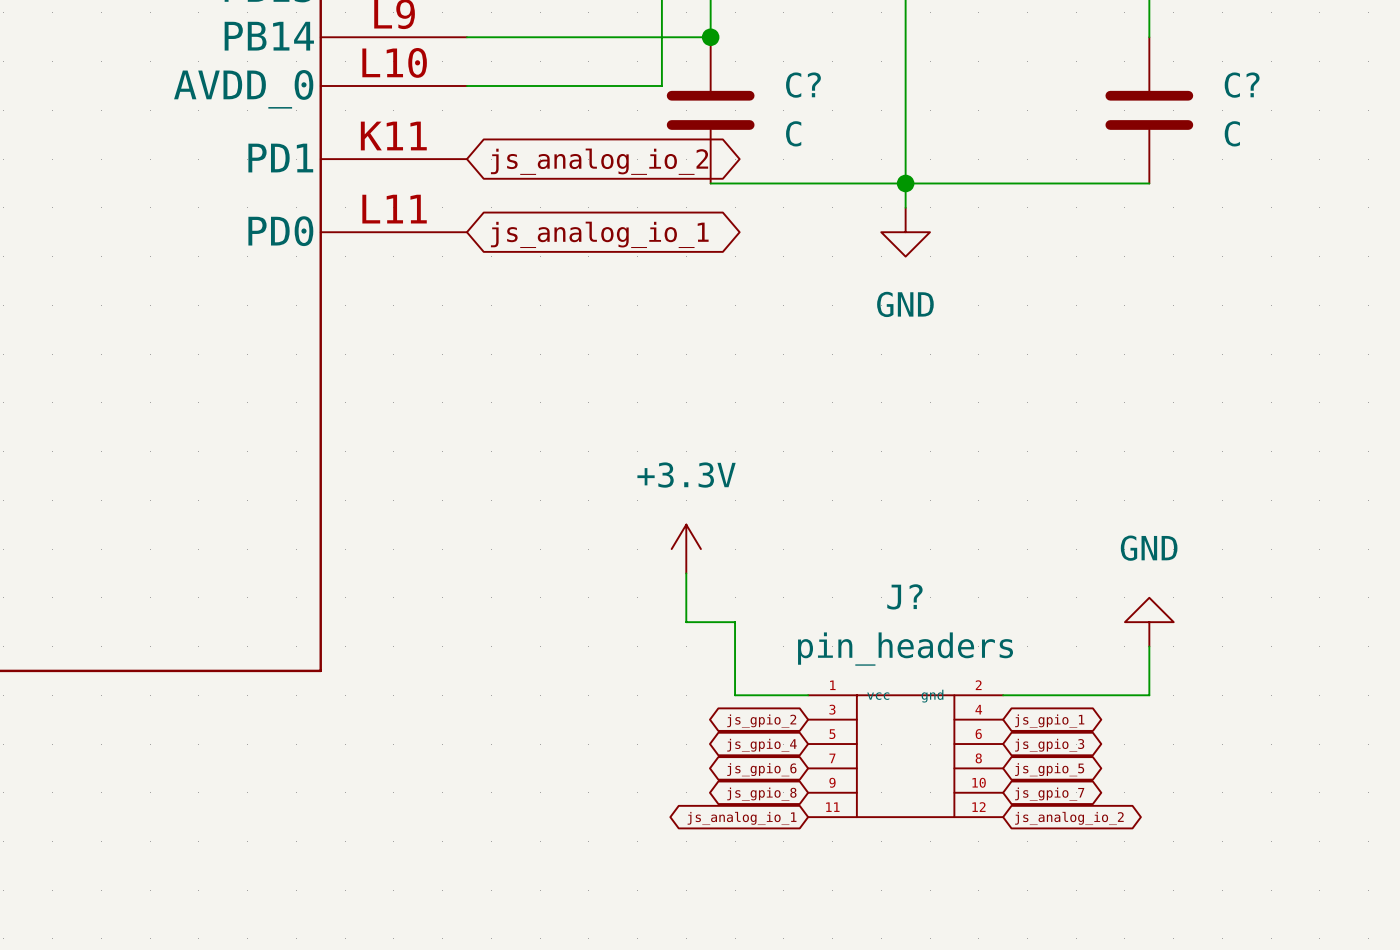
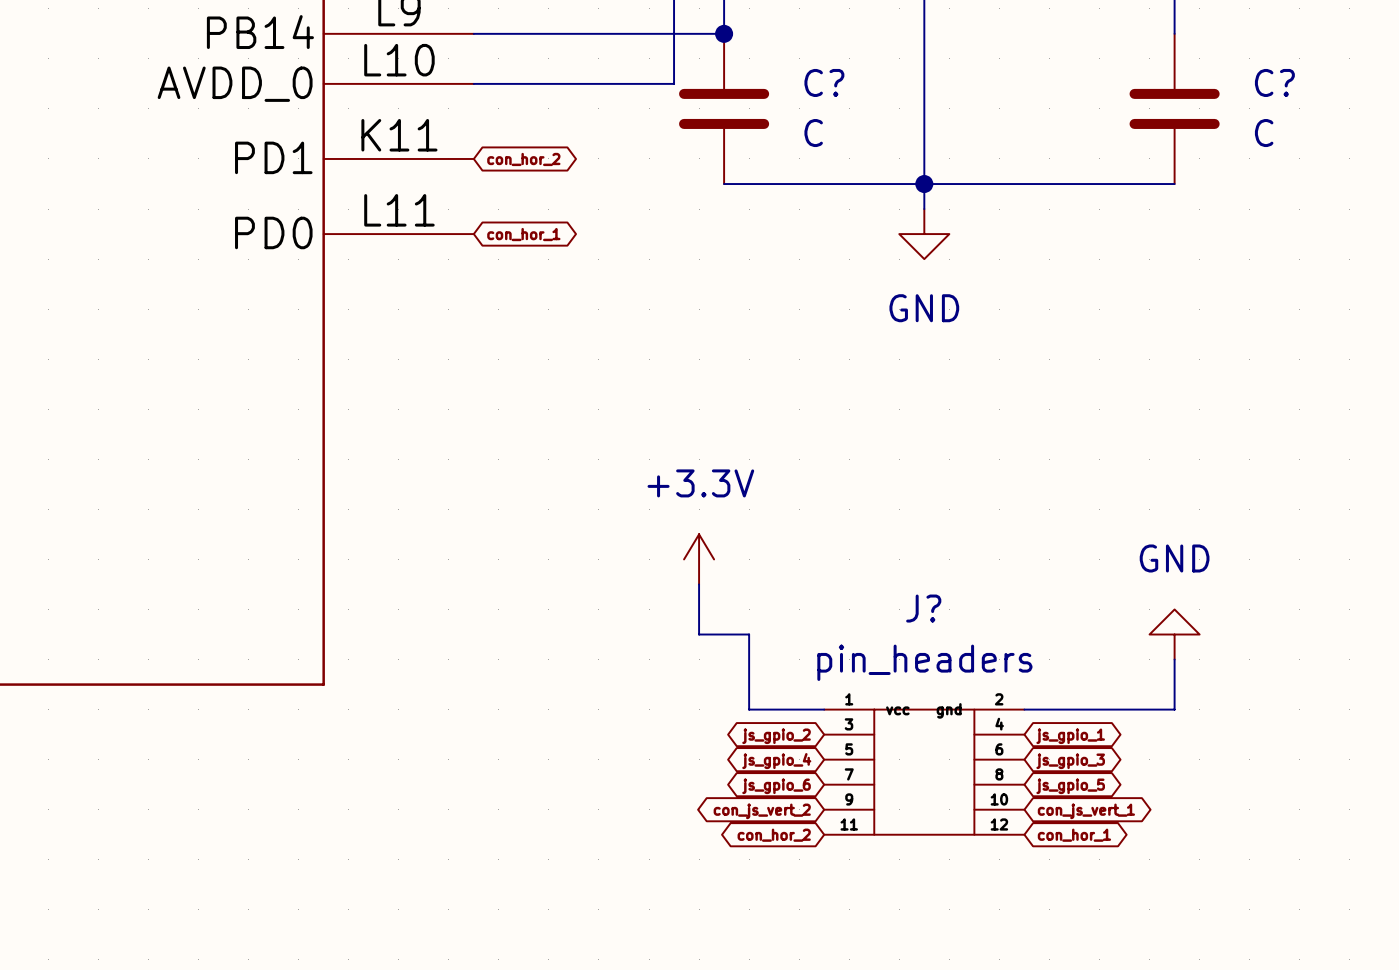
global label: js_analog_io_2 (599, 161) -> con_hor_2 (523, 159)
global label: js_analog_io_1 (599, 234) -> con_hor_1 (523, 234)
global label: js_gpio_8 (761, 794) -> con_js_vert_2 (762, 811)
global label: js_gpio_7 (1049, 794) -> con_js_vert_1 (1086, 811)
global label: js_analog_io_1 (742, 818) -> con_hor_2 (774, 835)
global label: js_analog_io_2 (1069, 818) -> con_hor_1 (1074, 835)

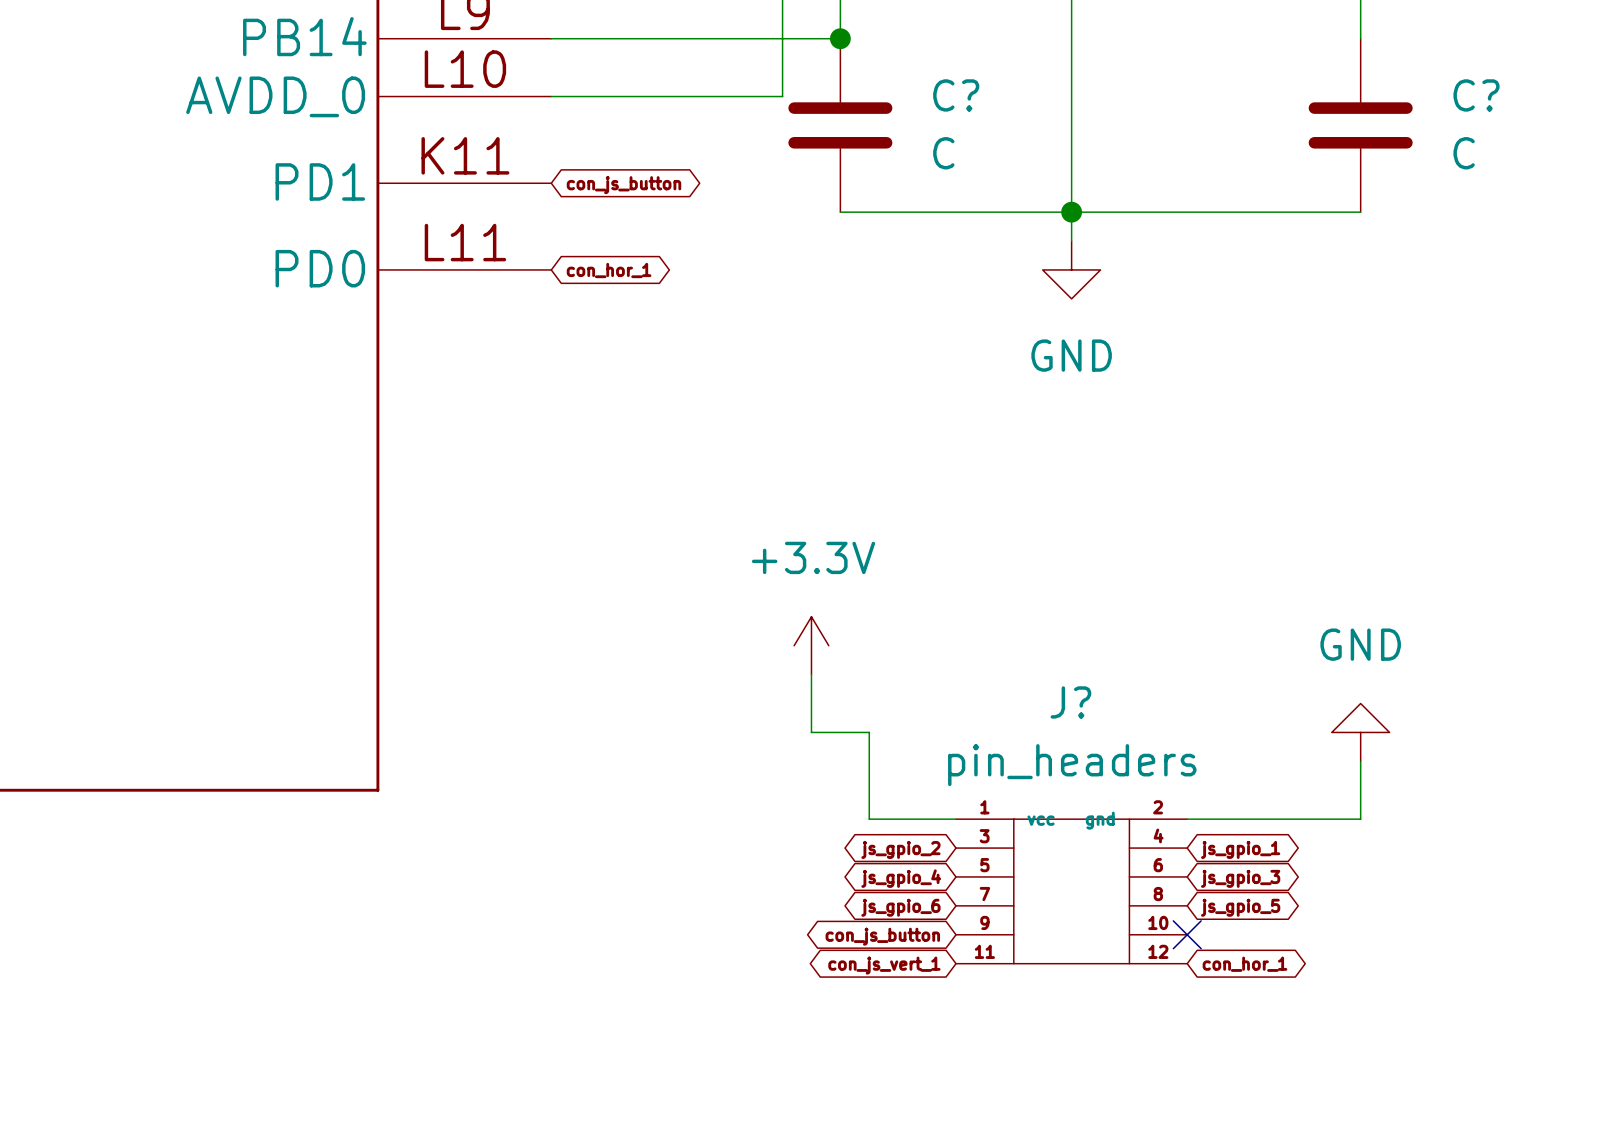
global label: con_hor_2 (523, 159) -> con_js_button (623, 185)
no-connect mark: none -> (1187, 934)
global label: con_js_vert_2 (762, 811) -> con_js_button (882, 936)
global label: con_js_vert_1 (1086, 811) -> none
global label: con_hor_2 (774, 835) -> con_js_vert_1 (884, 965)

